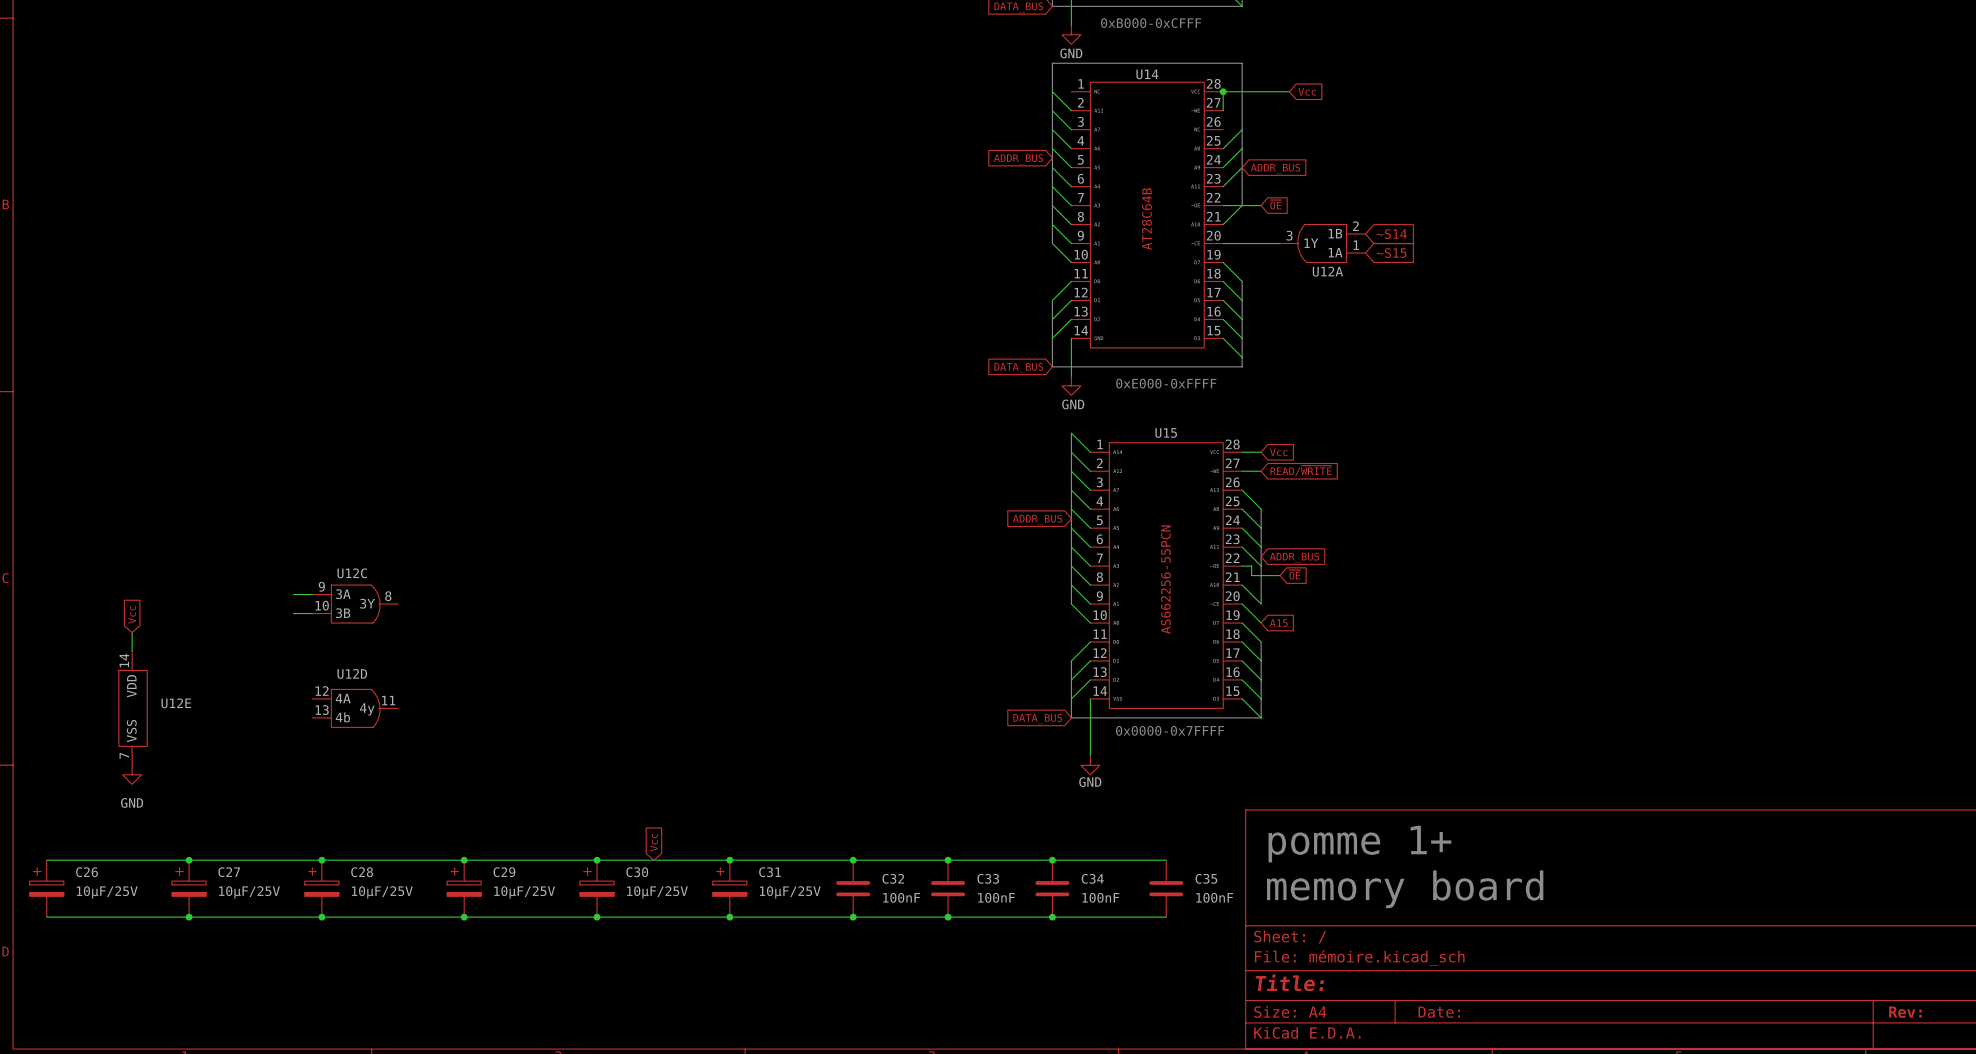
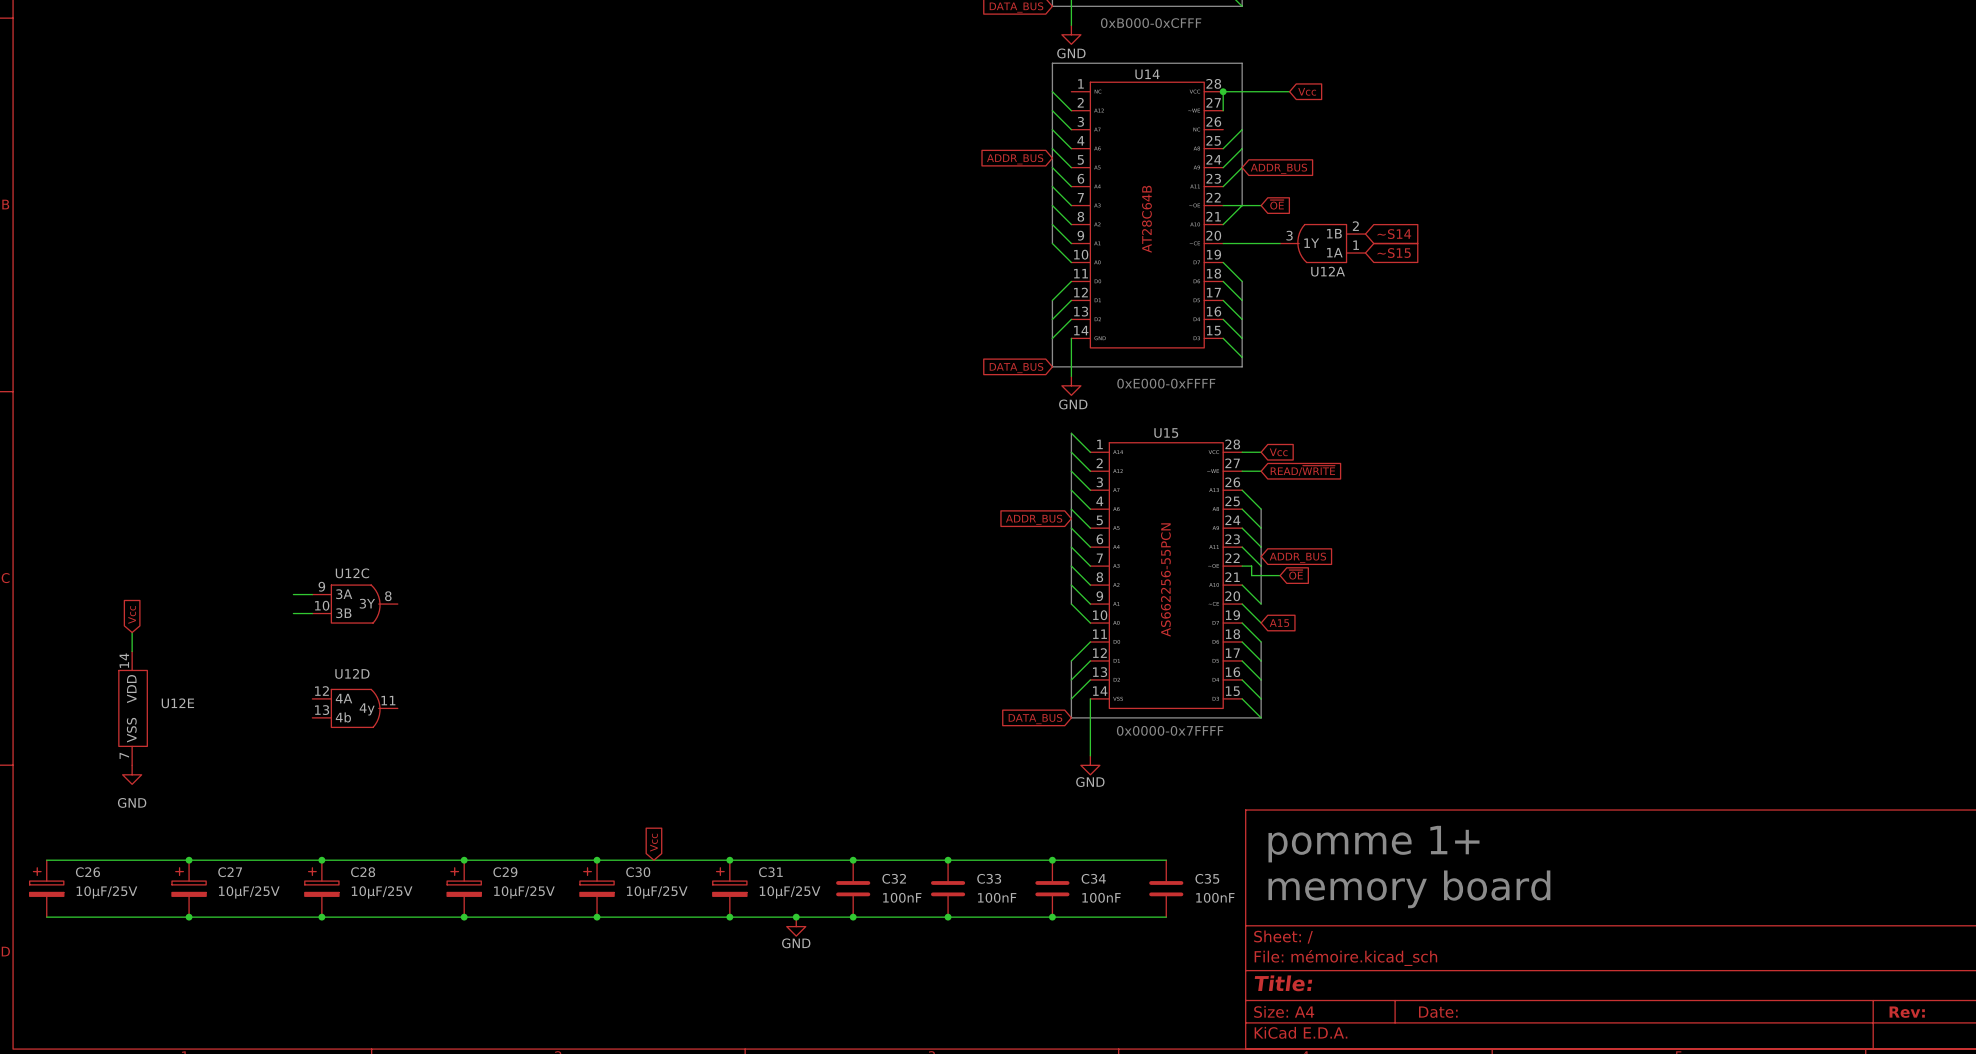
junction: none -> (796, 917)
power symbol: none -> GND (796, 926)

